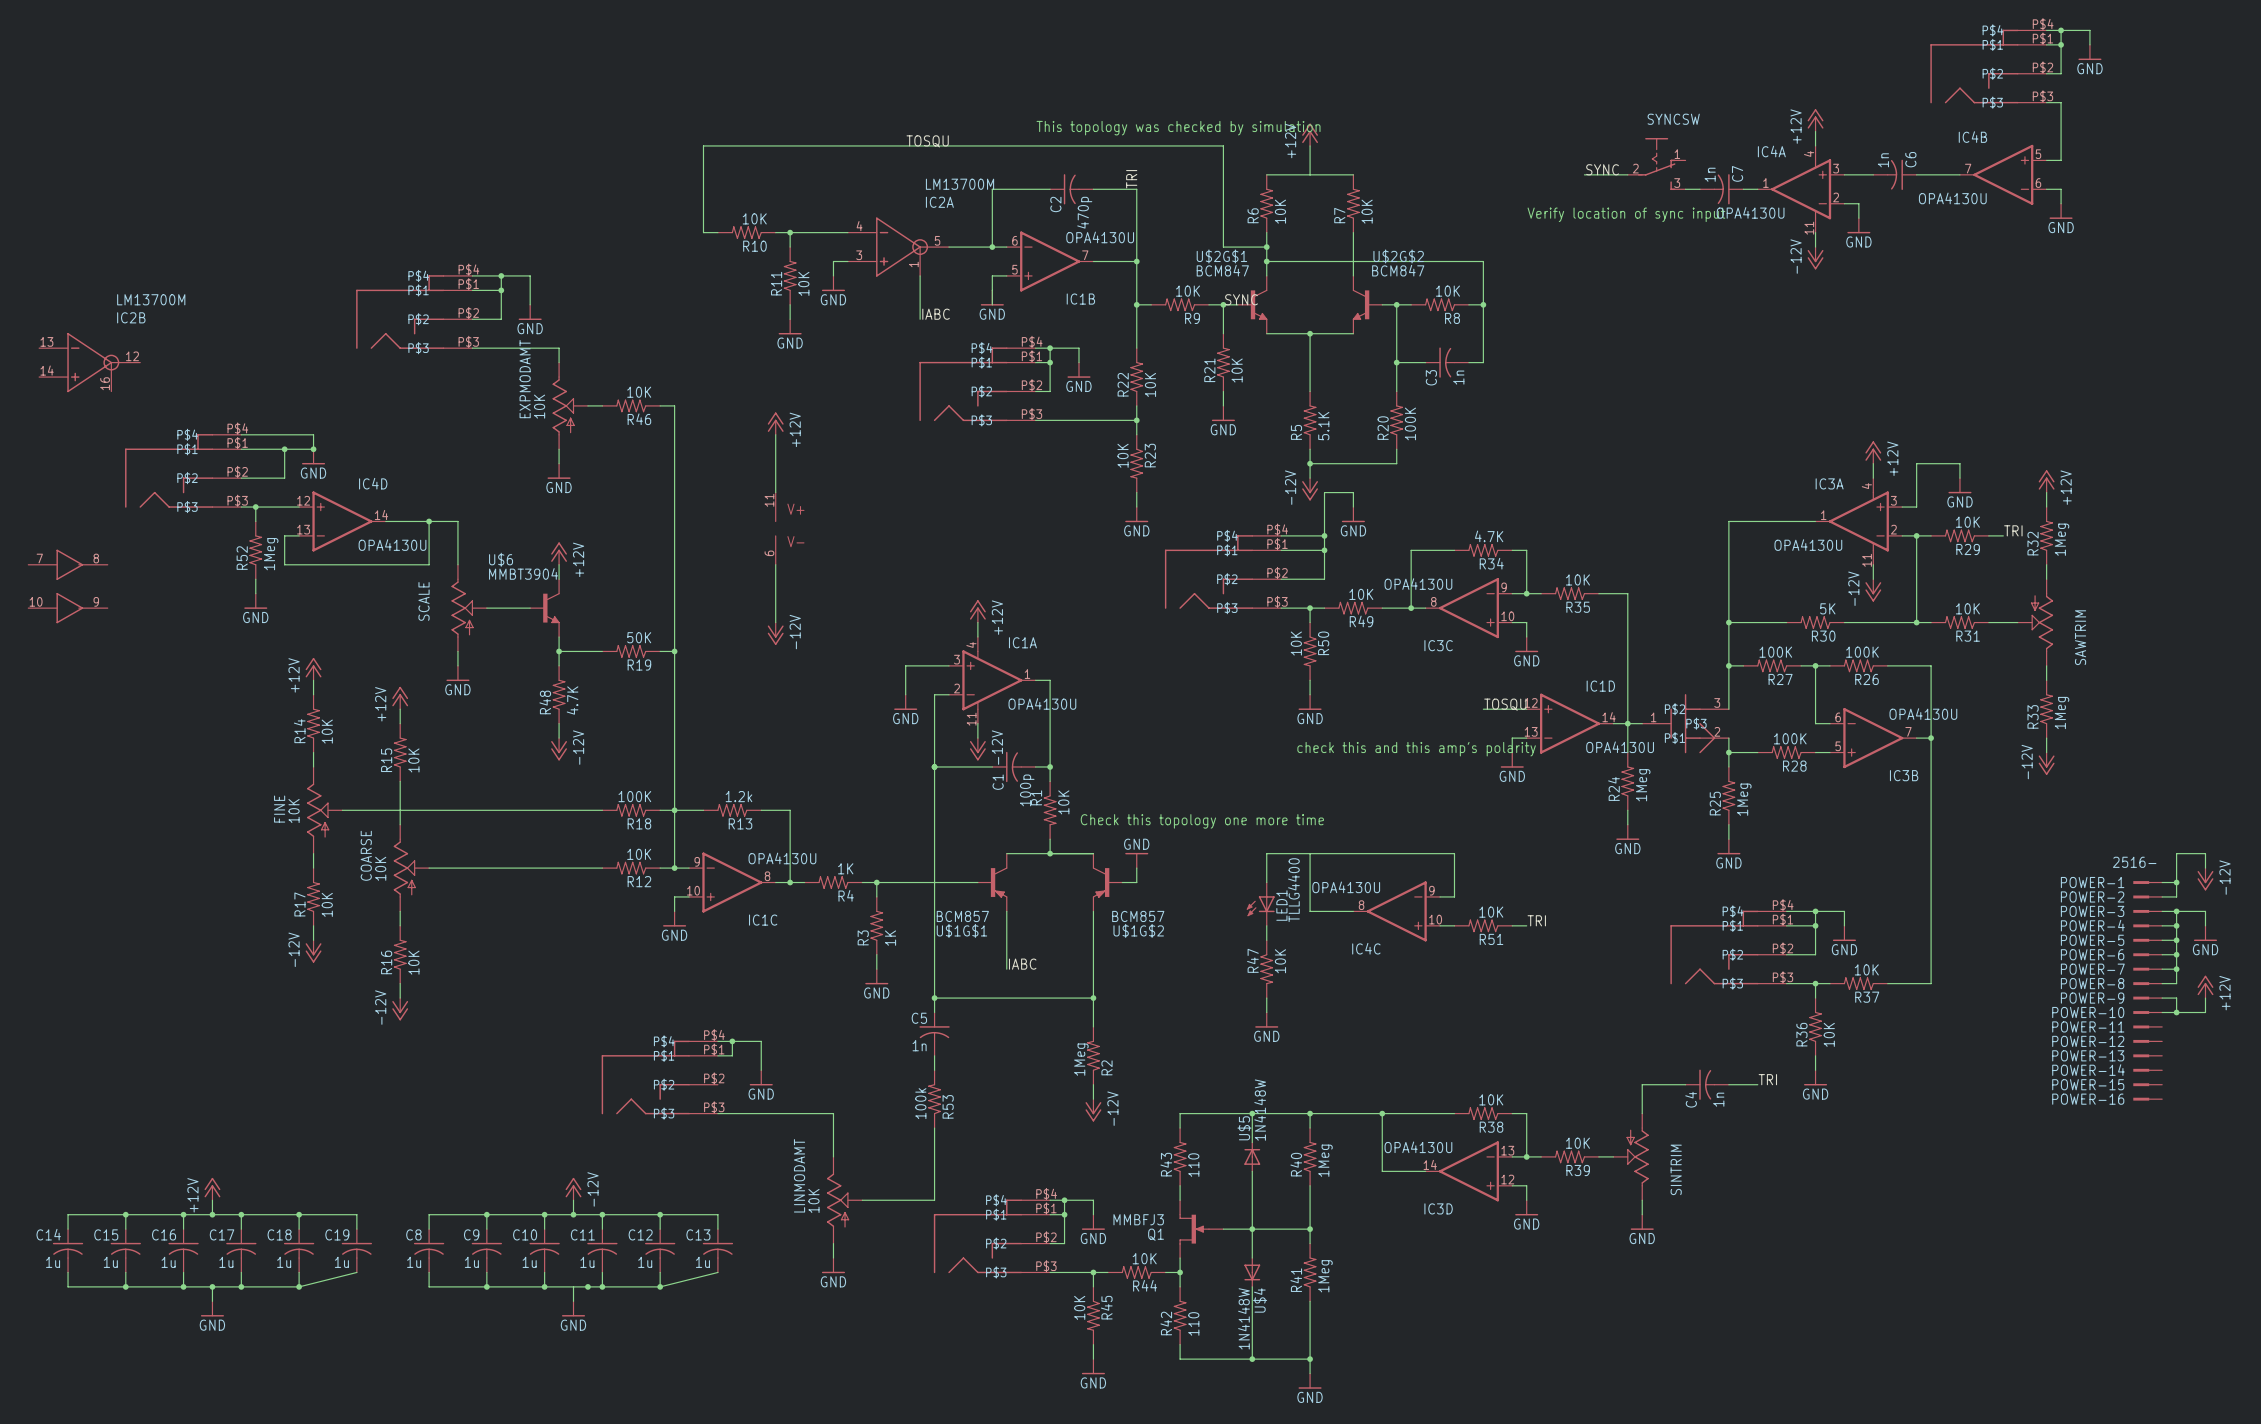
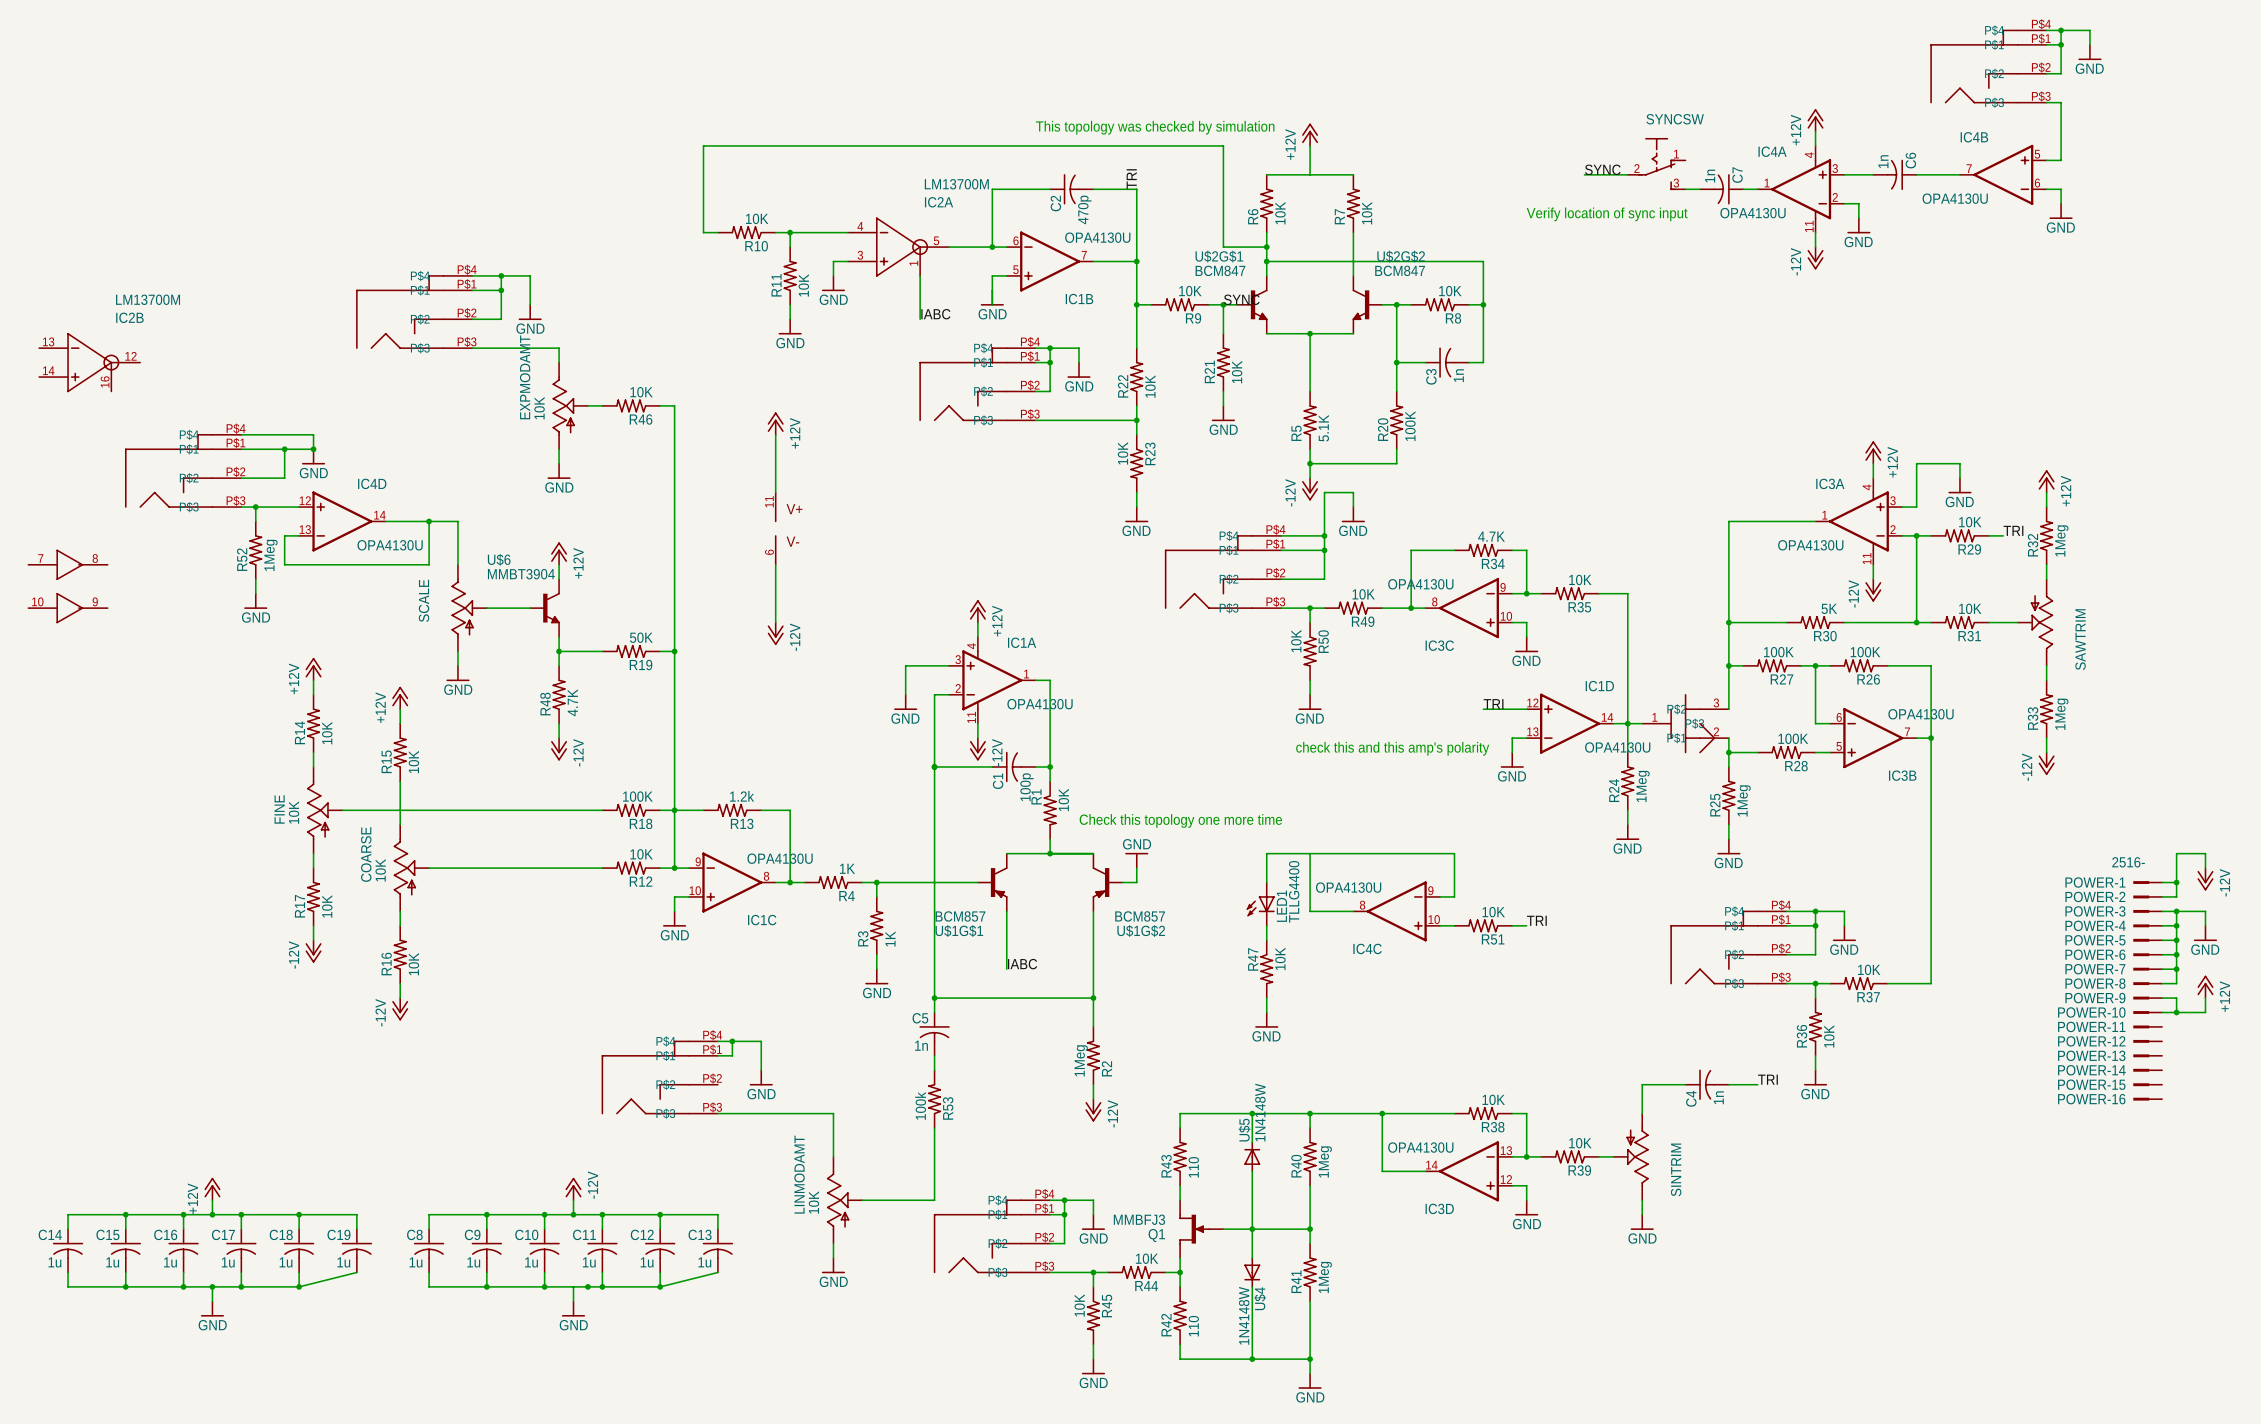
label: TOSQU (927, 141) -> none
label: TOSQU (1505, 704) -> TRI (1493, 704)

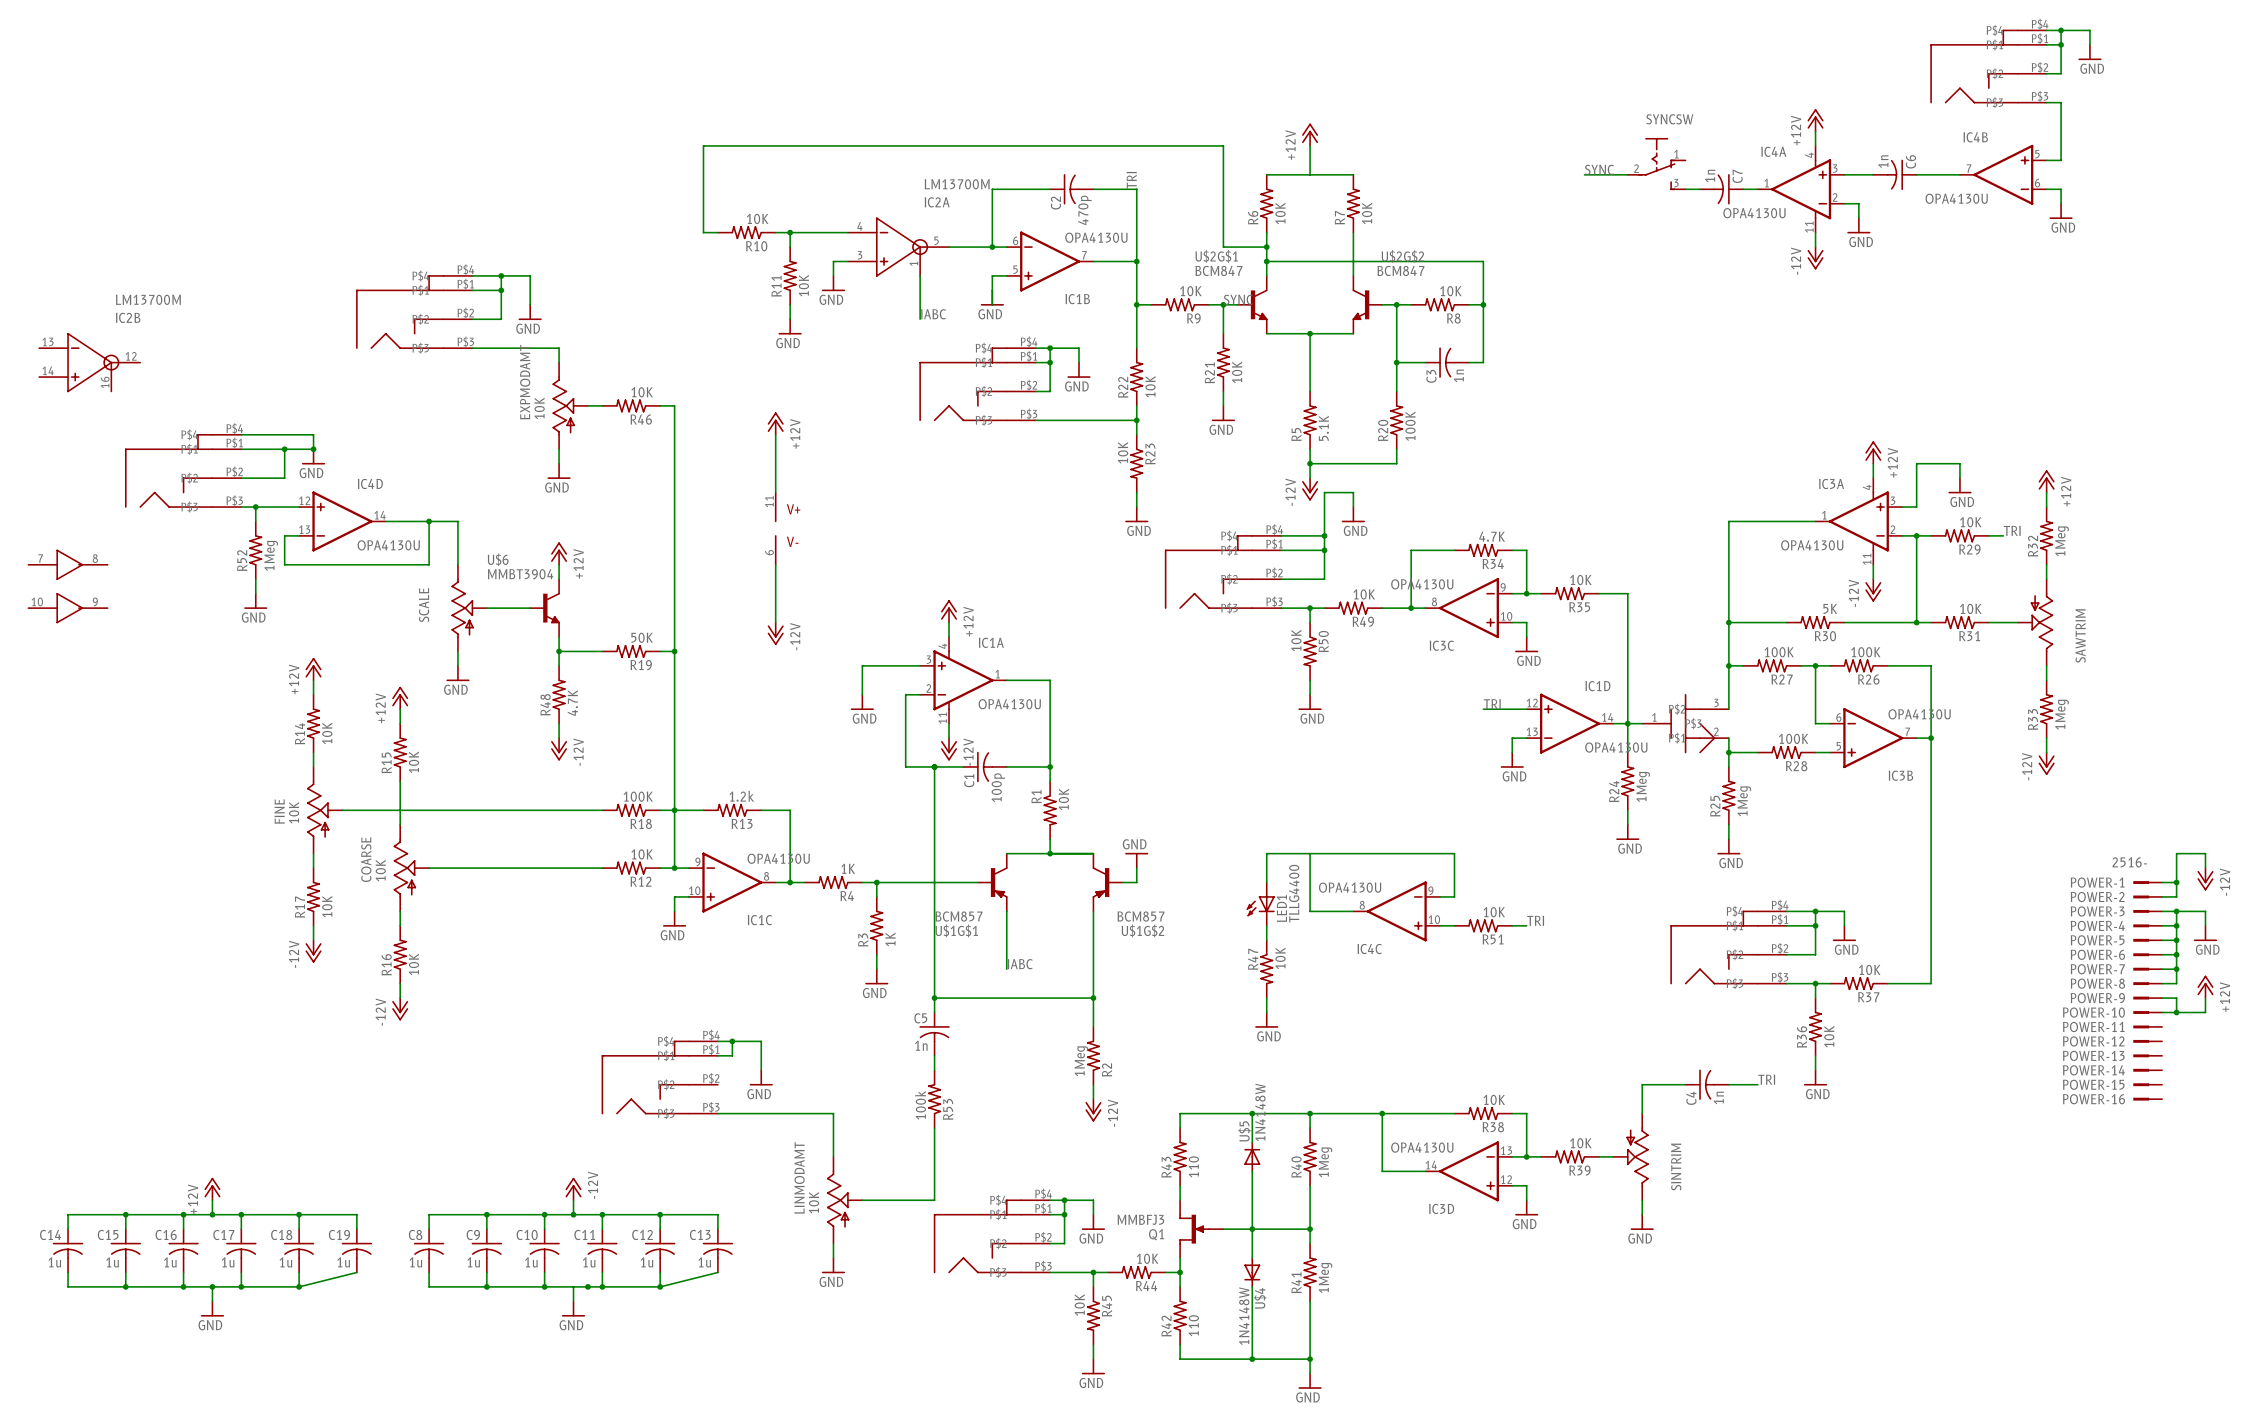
text: This topology was checked by simulation (1155, 127) -> none
text: Verify location of sync input (1607, 214) -> none
power symbol position: +12V (977, 611) -> +12V (949, 611)
wire: (977, 622) (977, 637) -> (949, 622) (949, 637)
wire: (905, 665) (905, 694) -> (905, 665) (862, 665) (862, 694)
IC1A position: (992, 680) -> (963, 680)
wire: (949, 694) (934, 694) (934, 766) -> (920, 694) (905, 694) (905, 766) (934, 766)
power symbol position: GND (905, 702) -> GND (862, 702)
wire: (977, 723) (977, 738) -> (949, 723) (949, 738)
text: check this and this amp's polarity (1392, 748) -> none
power symbol position: -12V (977, 749) -> -12V (949, 749)
C1 position: (1013, 766) -> (985, 766)
text: Check this topology one more time (1180, 820) -> none

